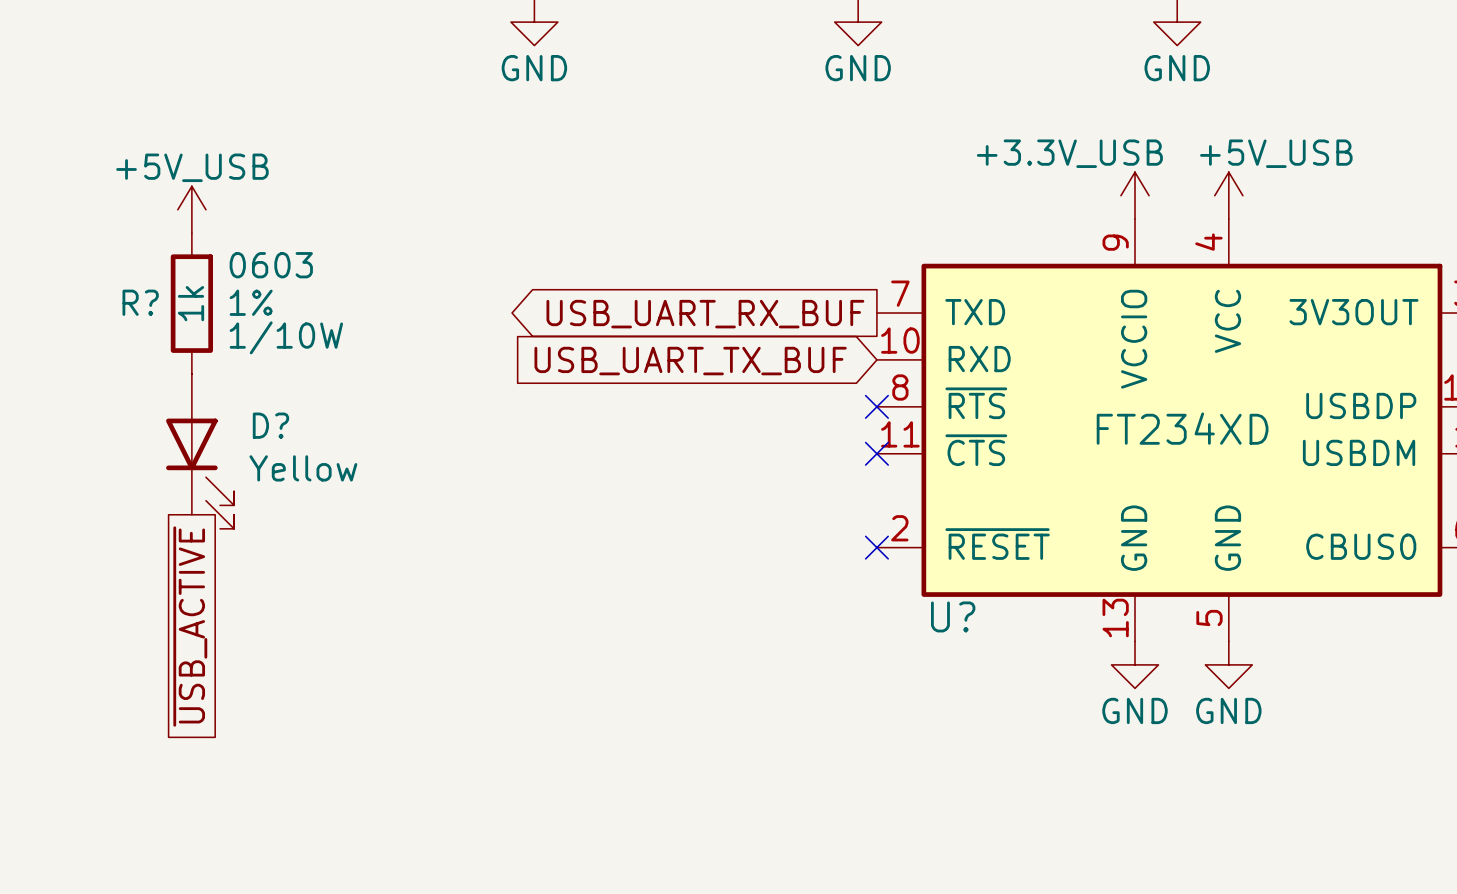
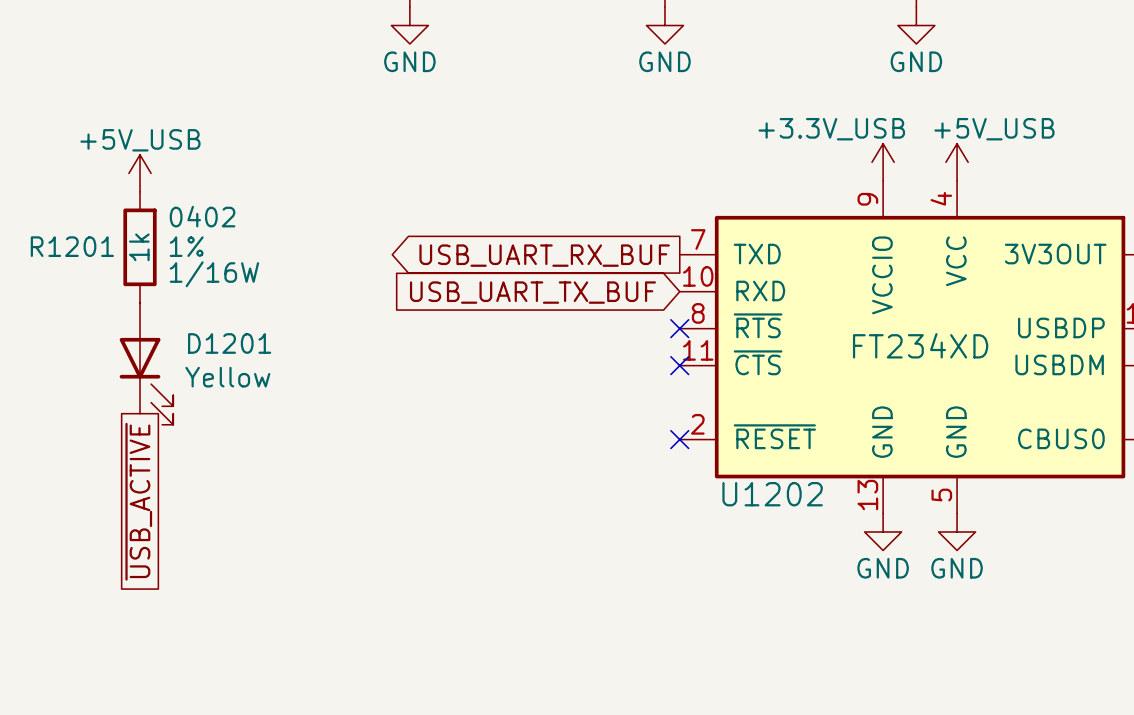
R? text: 0603 (271, 265) -> 0402 (202, 216)
R? name: R? (140, 302) -> R1201 (72, 246)
R? text: 1/10W (286, 337) -> 1/16W (214, 274)
D? name: D? (270, 425) -> D1201 (229, 343)
U? name: U? (953, 616) -> U1202 (772, 494)

